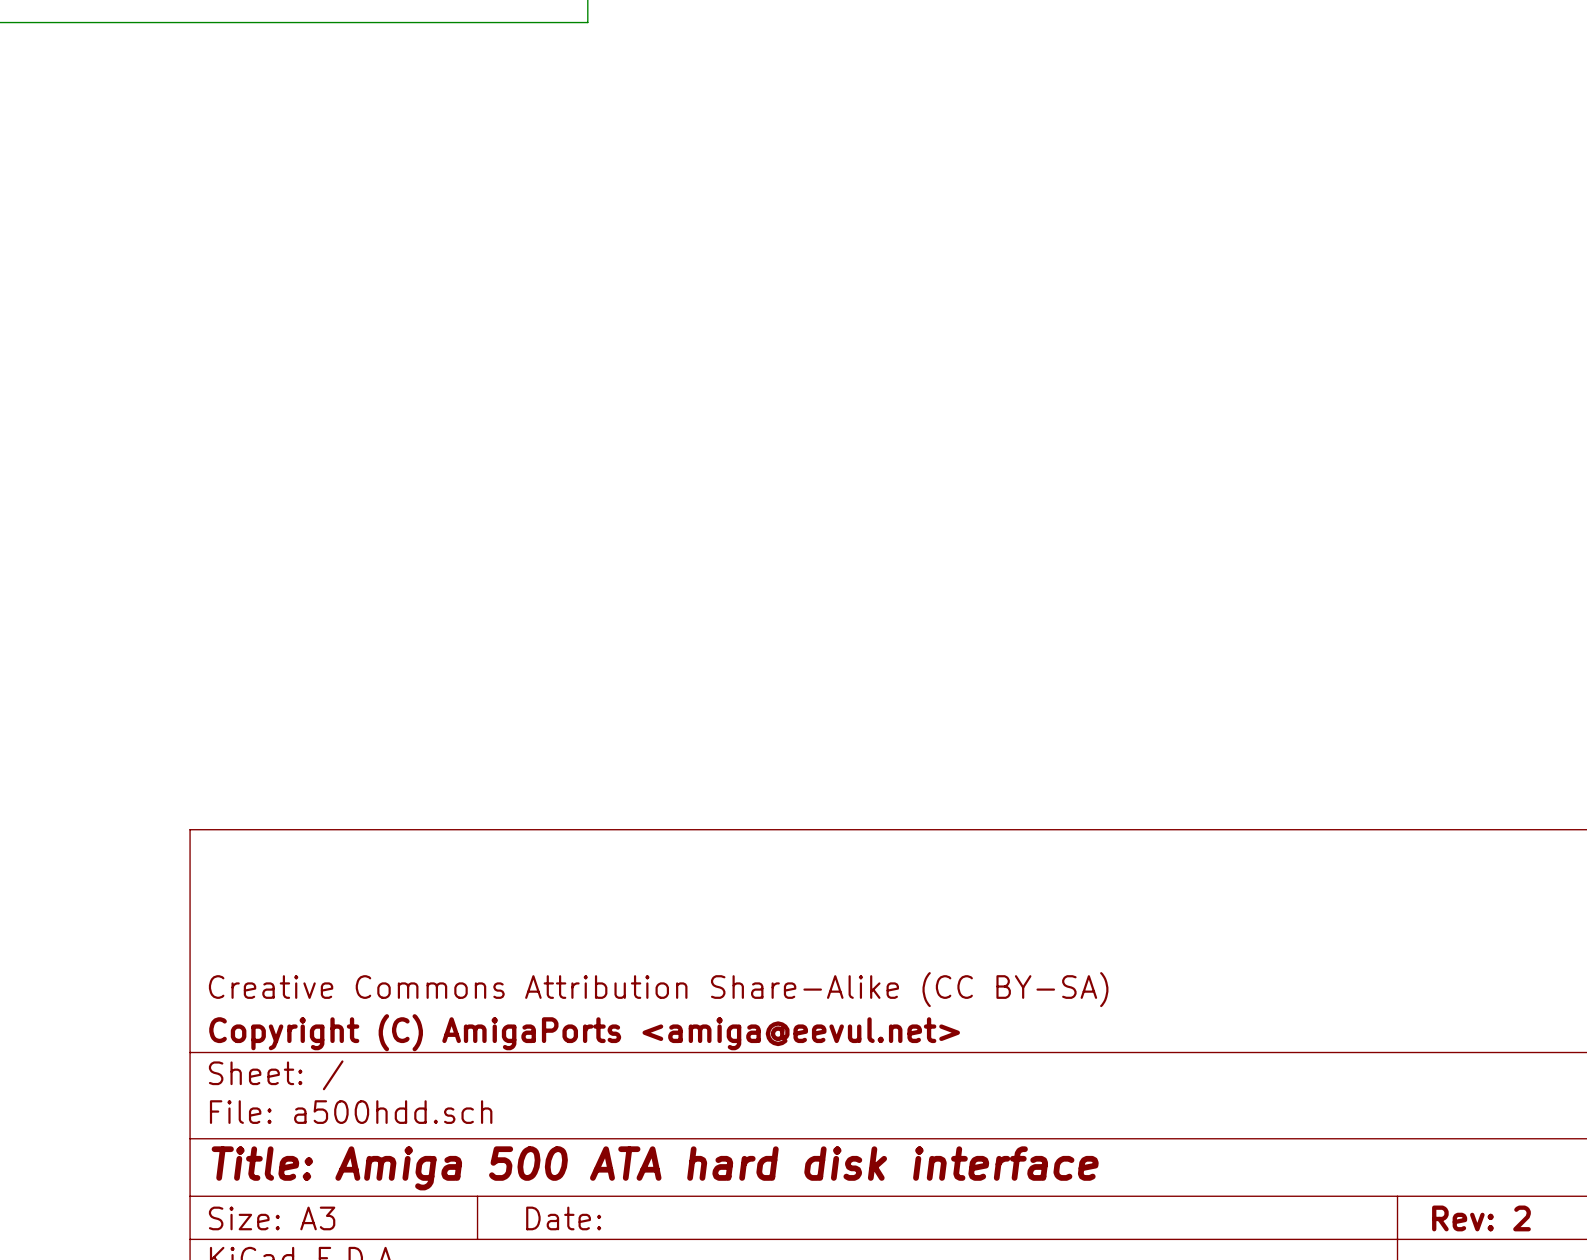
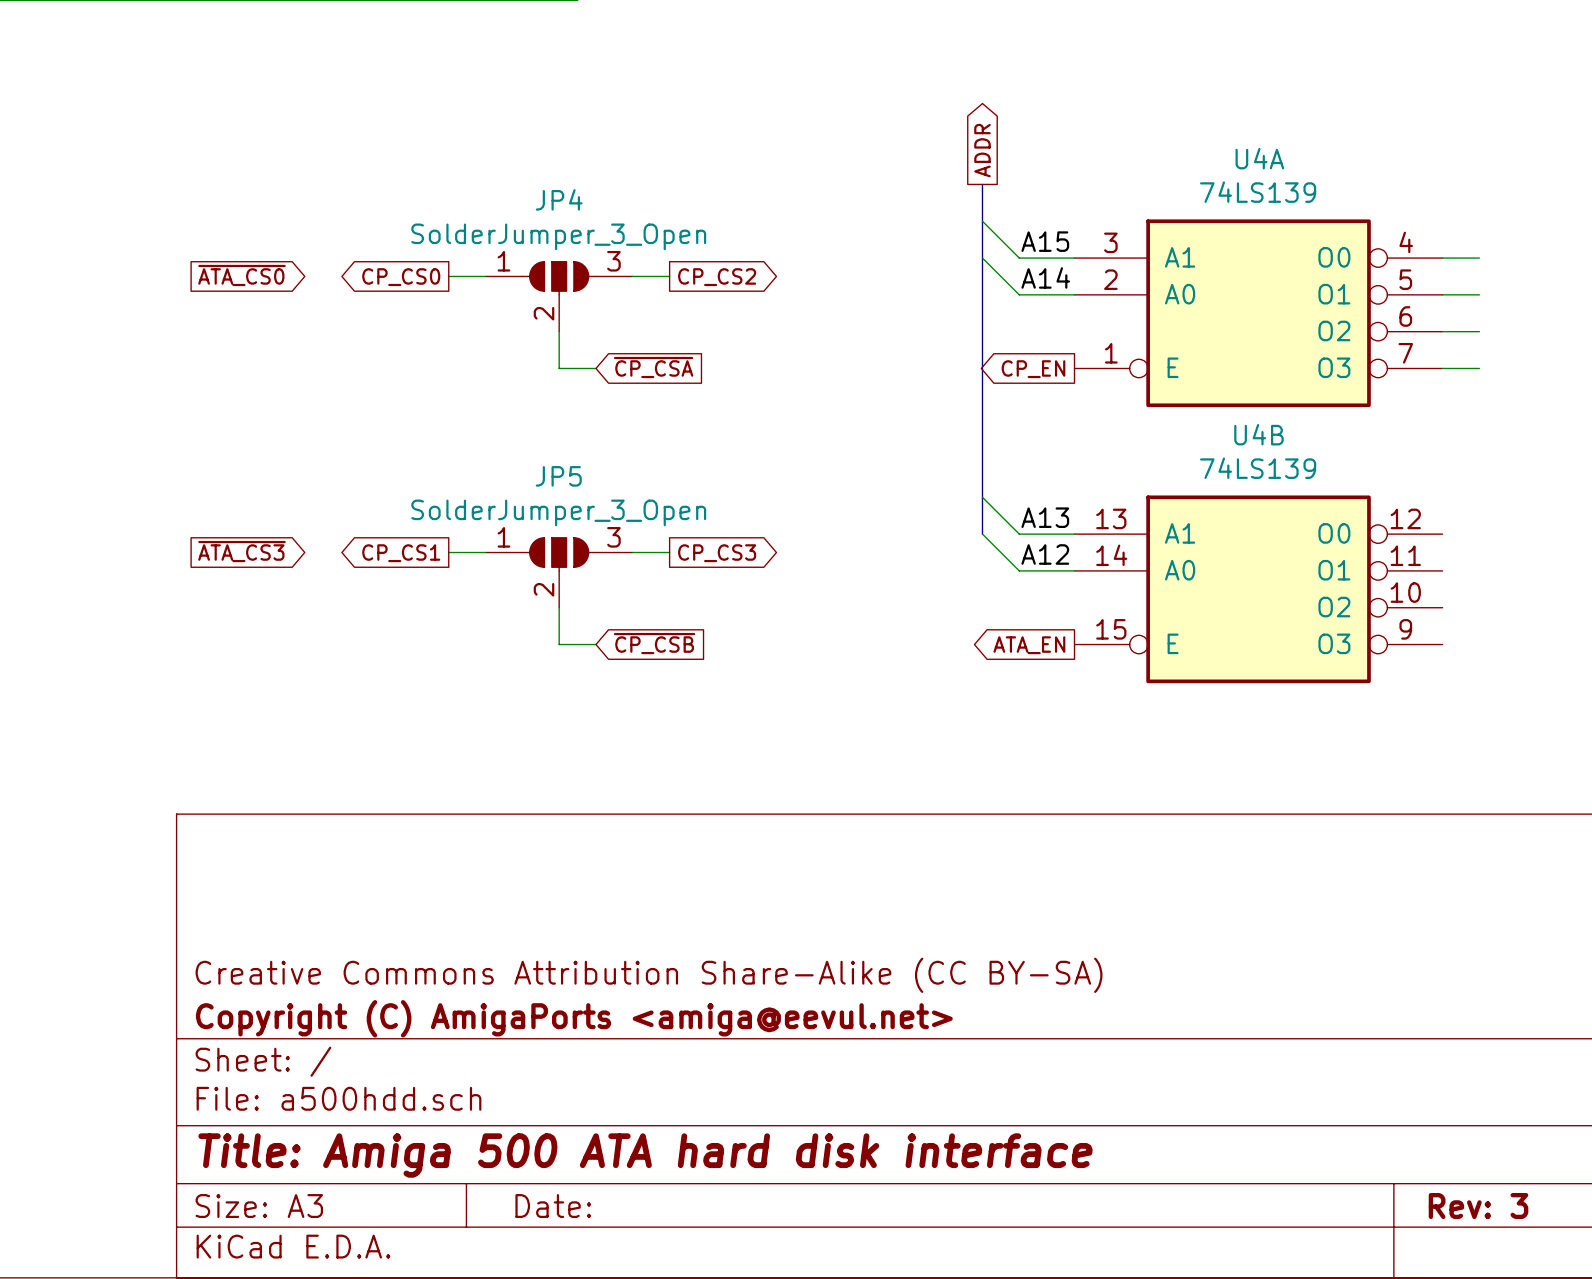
global label: none -> ADDR (982, 150)
bus: none -> (982, 184) (982, 534)
wire: none -> (982, 221) (1019, 258) (1074, 258)
label: none -> A15 (1045, 241)
wire: none -> (982, 258) (1019, 294) (1074, 294)
wire: none -> (1442, 258) (1479, 258)
global label: none -> ~{ATA_CS0} (241, 275)
wire: none -> (448, 276) (485, 276)
wire: none -> (632, 276) (669, 276)
global label: none -> CP_CS0 (401, 277)
global label: none -> CP_CS2 (717, 277)
label: none -> A14 (1045, 277)
wire: none -> (1442, 294) (1479, 294)
JP4: none -> SolderJumper_3_Open (559, 296)
U4A: none -> 74LS139 (1258, 313)
wire: none -> (559, 331) (559, 368) (595, 368)
wire: none -> (1442, 331) (1479, 331)
global label: none -> ~{CP_CSA} (653, 367)
wire: none -> (1442, 368) (1479, 368)
global label: none -> CP_EN (1033, 369)
wire: none -> (982, 497) (1019, 534) (1074, 534)
label: none -> A13 (1045, 517)
wire: none -> (982, 534) (1019, 570) (1074, 570)
global label: none -> ~{ATA_CS3} (241, 551)
global label: none -> CP_CS1 (401, 553)
wire: none -> (448, 552) (485, 552)
wire: none -> (632, 552) (669, 552)
global label: none -> CP_CS3 (717, 553)
label: none -> A12 (1045, 554)
JP5: none -> SolderJumper_3_Open (559, 572)
U4B: none -> 74LS139 (1258, 589)
wire: none -> (559, 607) (559, 644) (595, 644)
global label: none -> ~{CP_CSB} (654, 643)
global label: none -> ATA_EN (1029, 645)
title block: Rev: 2 (1481, 1218) -> Rev: 3 (1478, 1206)

